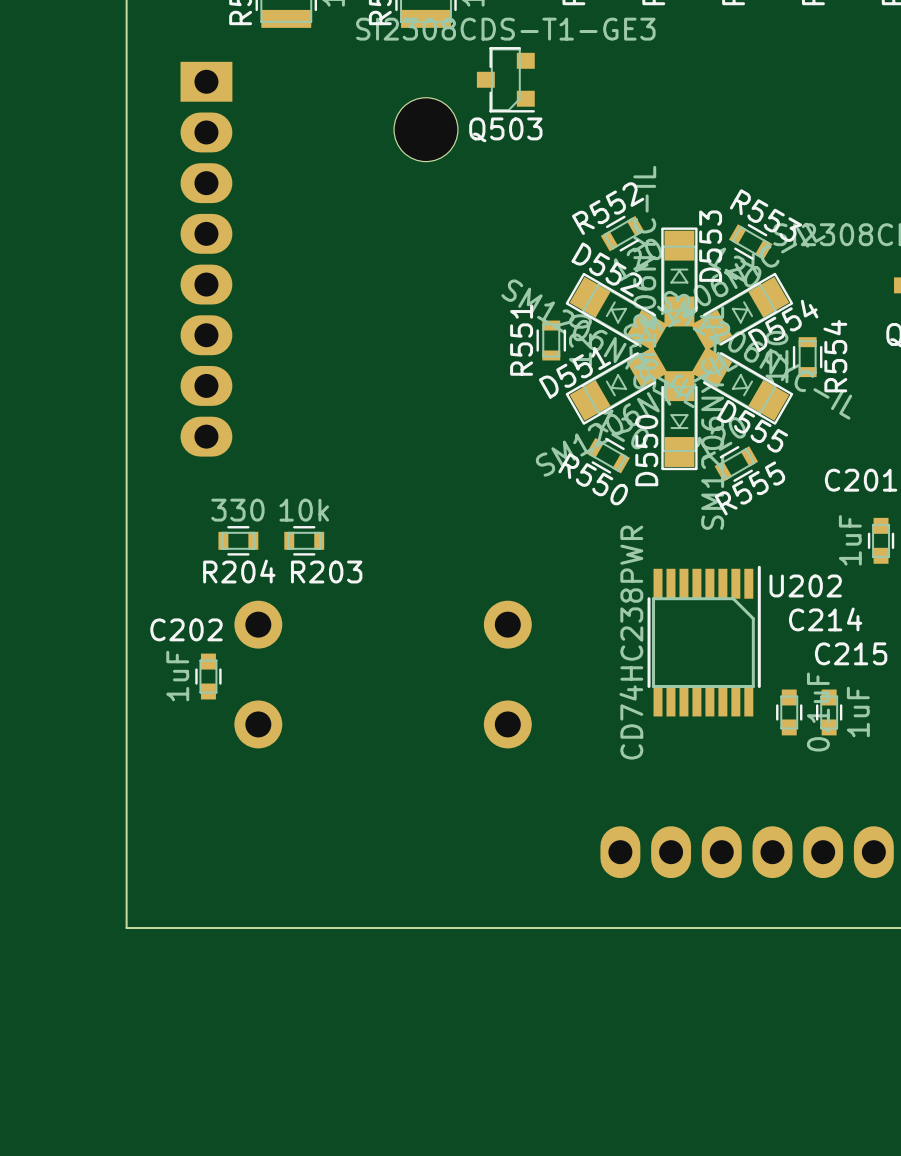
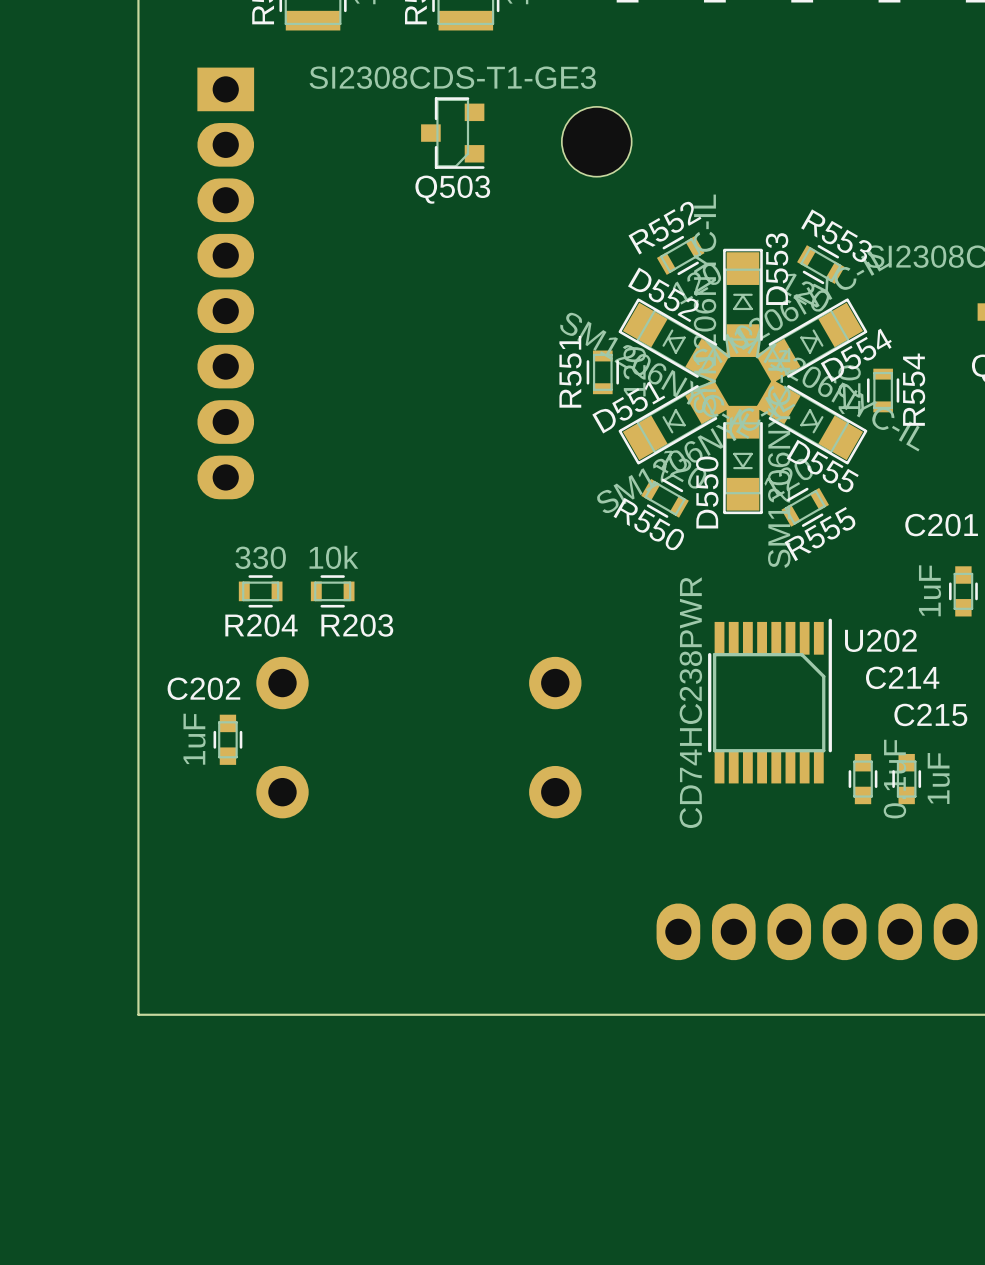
Q503 position: (505, 79) -> (452, 133)
part position: (425, 129) -> (596, 141)

